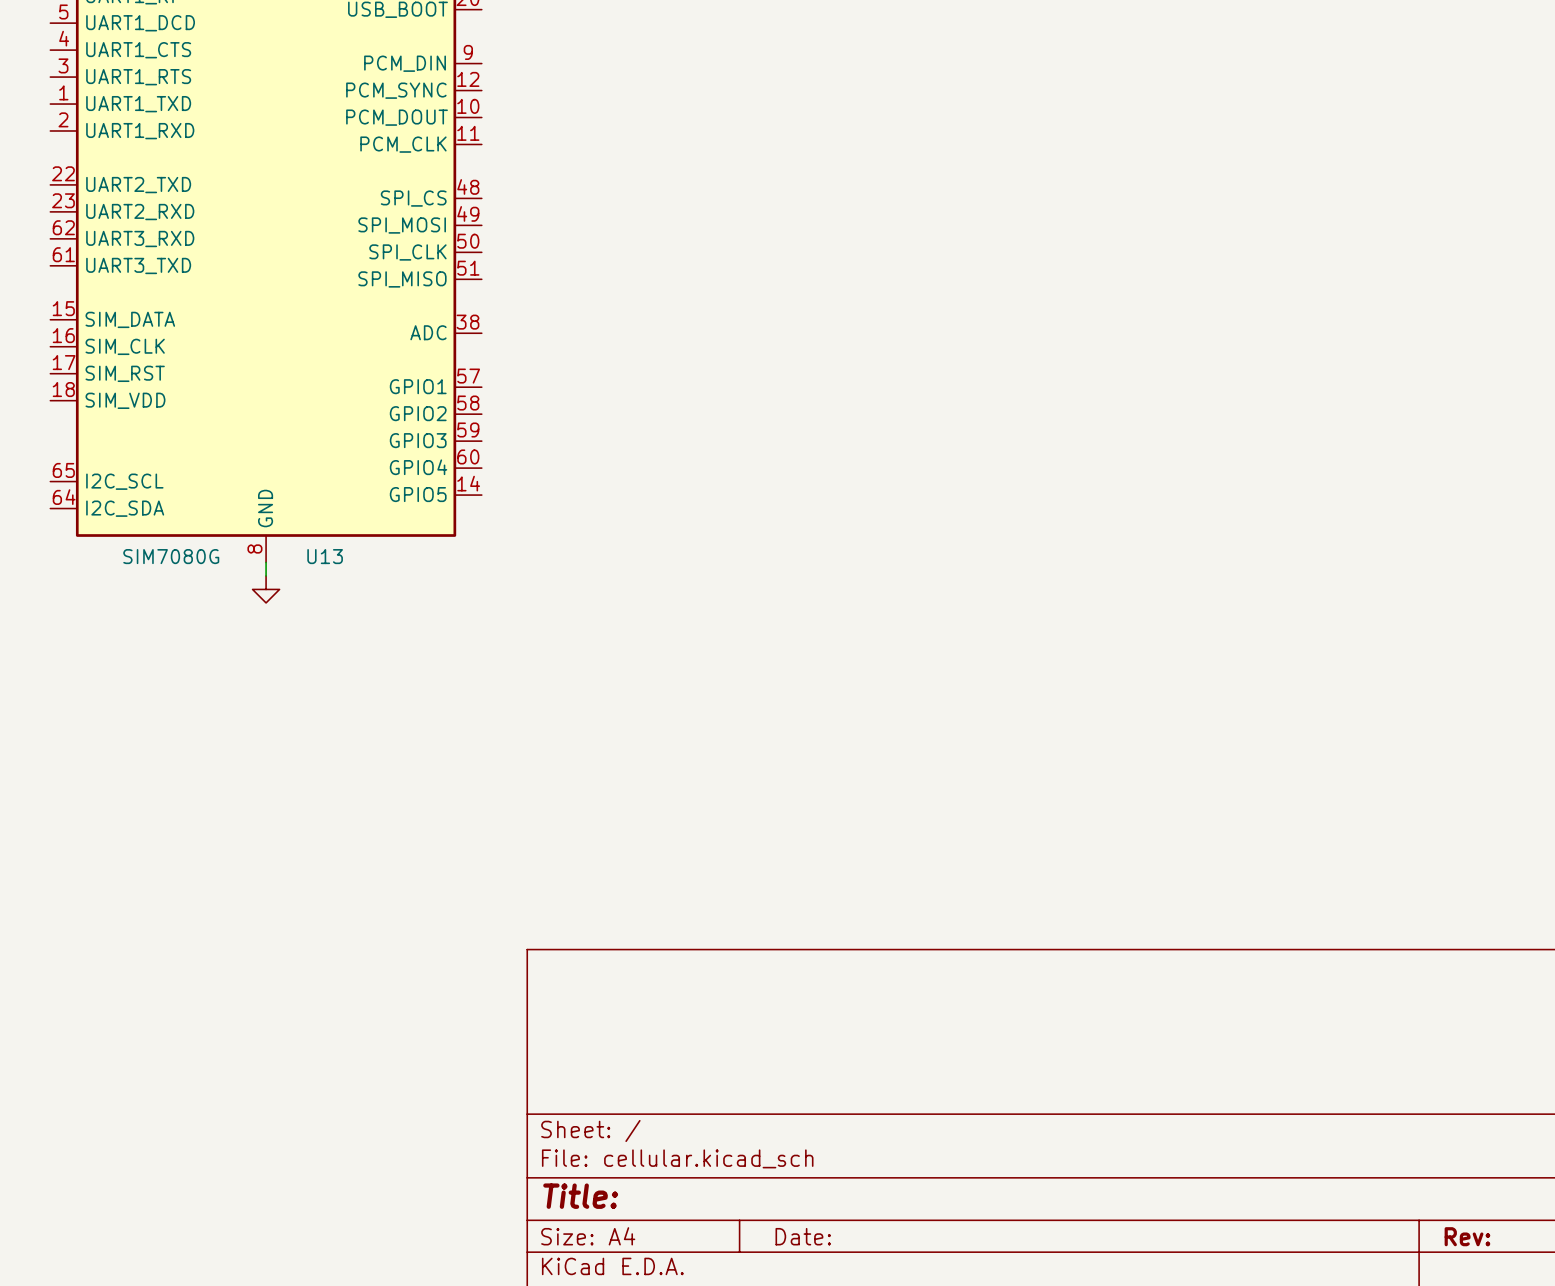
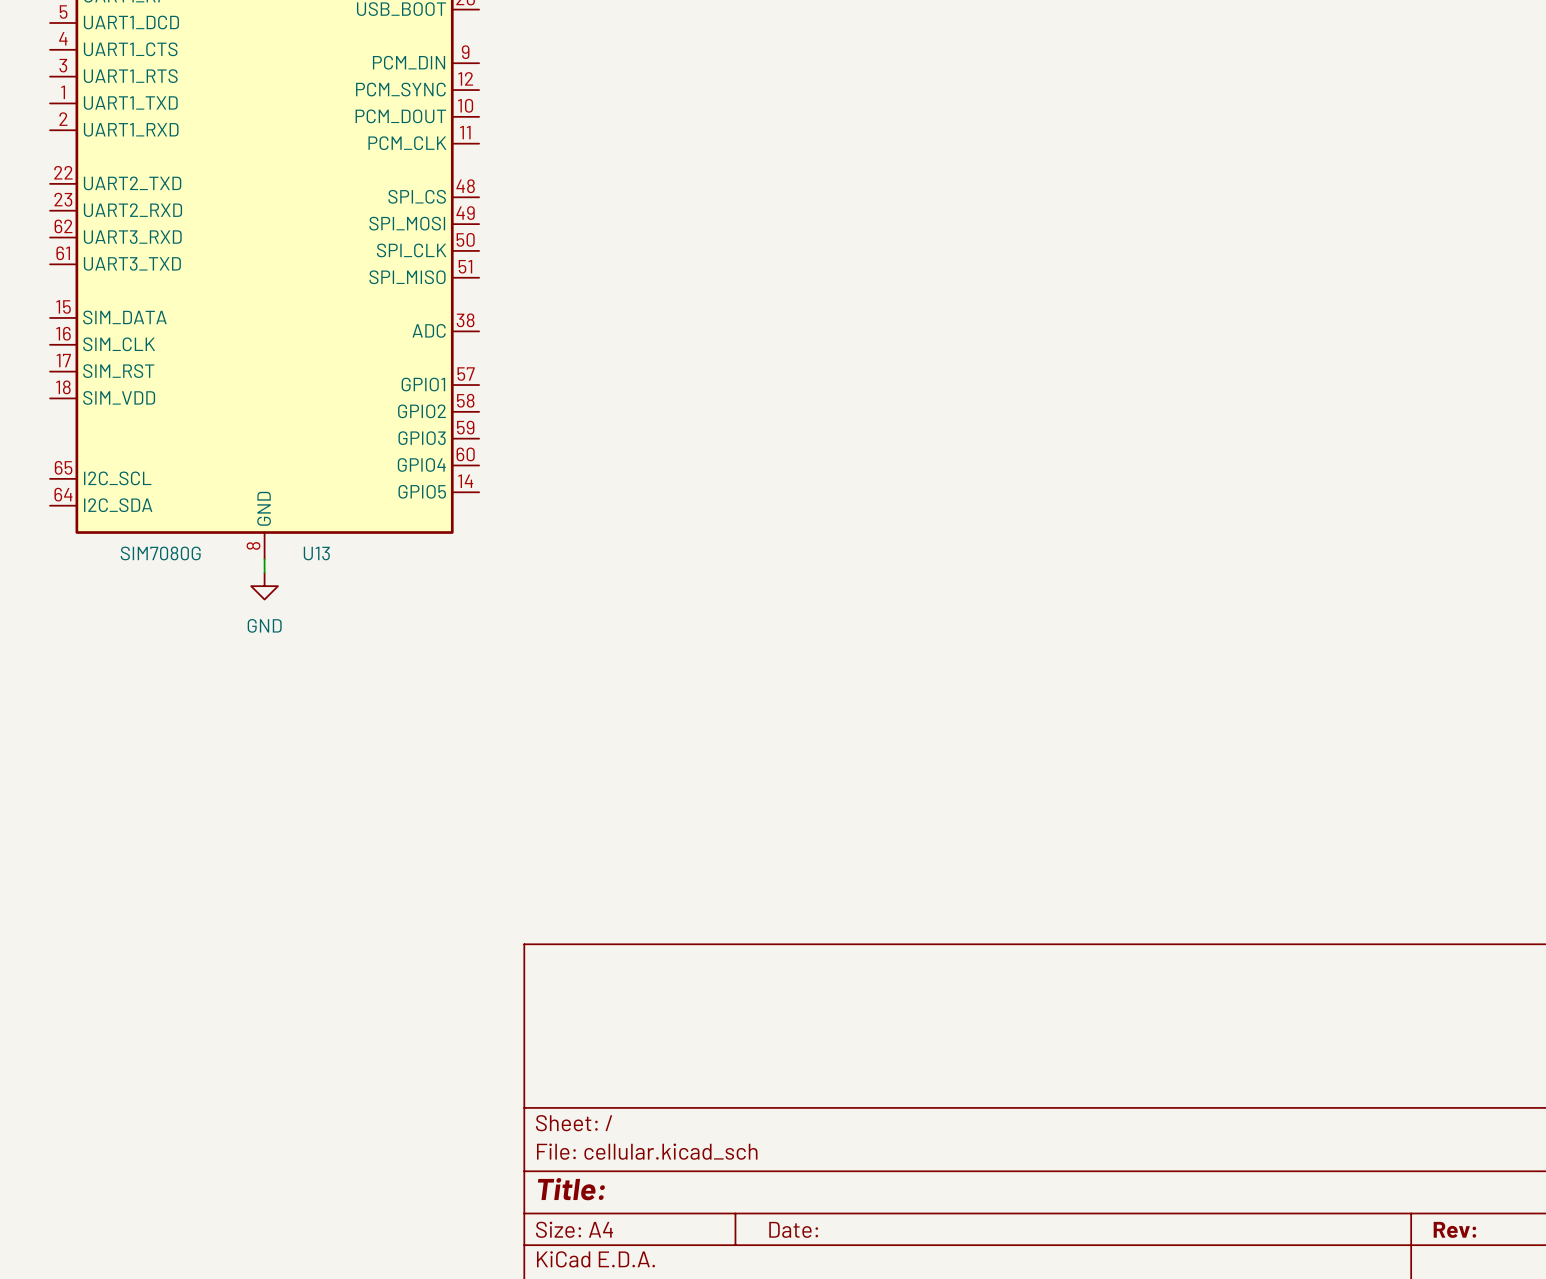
power symbol text: none -> GND (264, 625)

